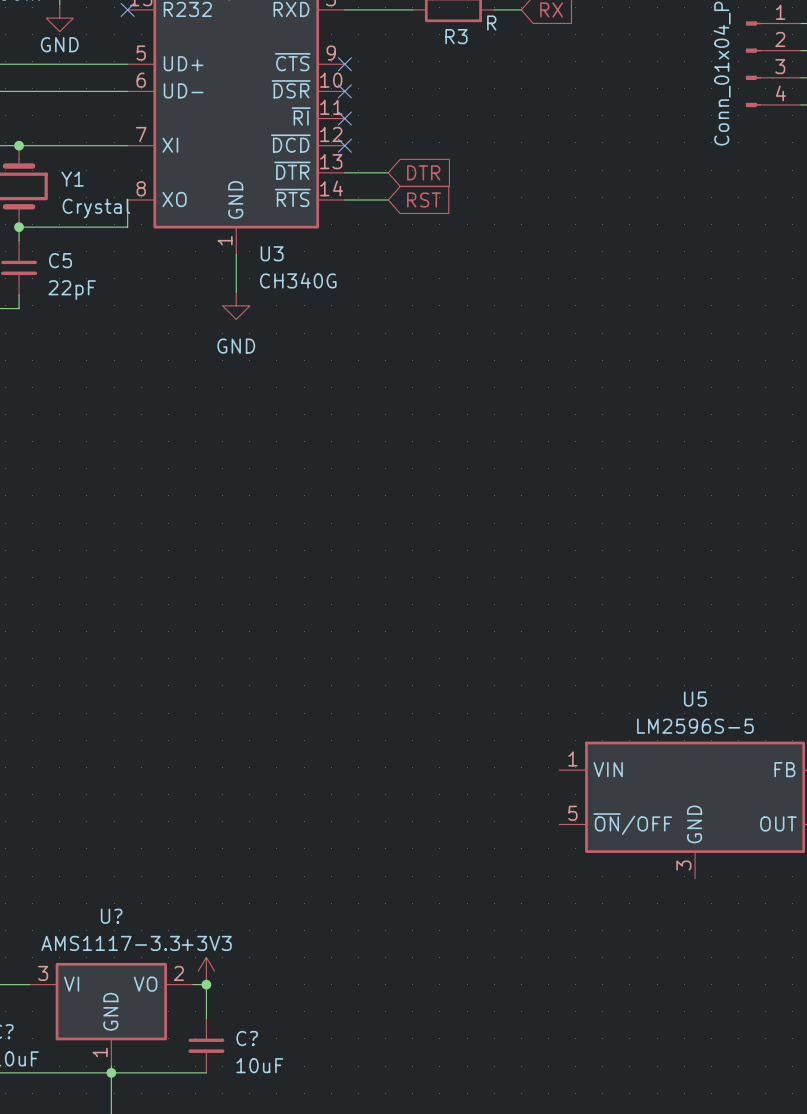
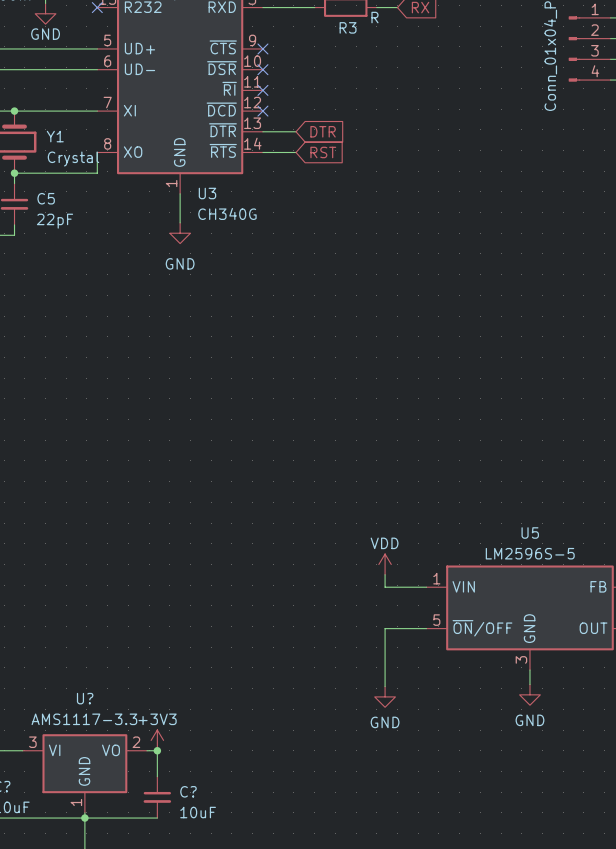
power symbol: none -> VDD (385, 564)
wire: none -> (385, 574) (385, 587) (426, 587)
wire: none -> (426, 628) (385, 628) (385, 686)
wire: none -> (529, 670) (529, 684)
power symbol: none -> GND (529, 694)
power symbol: none -> GND (385, 696)

